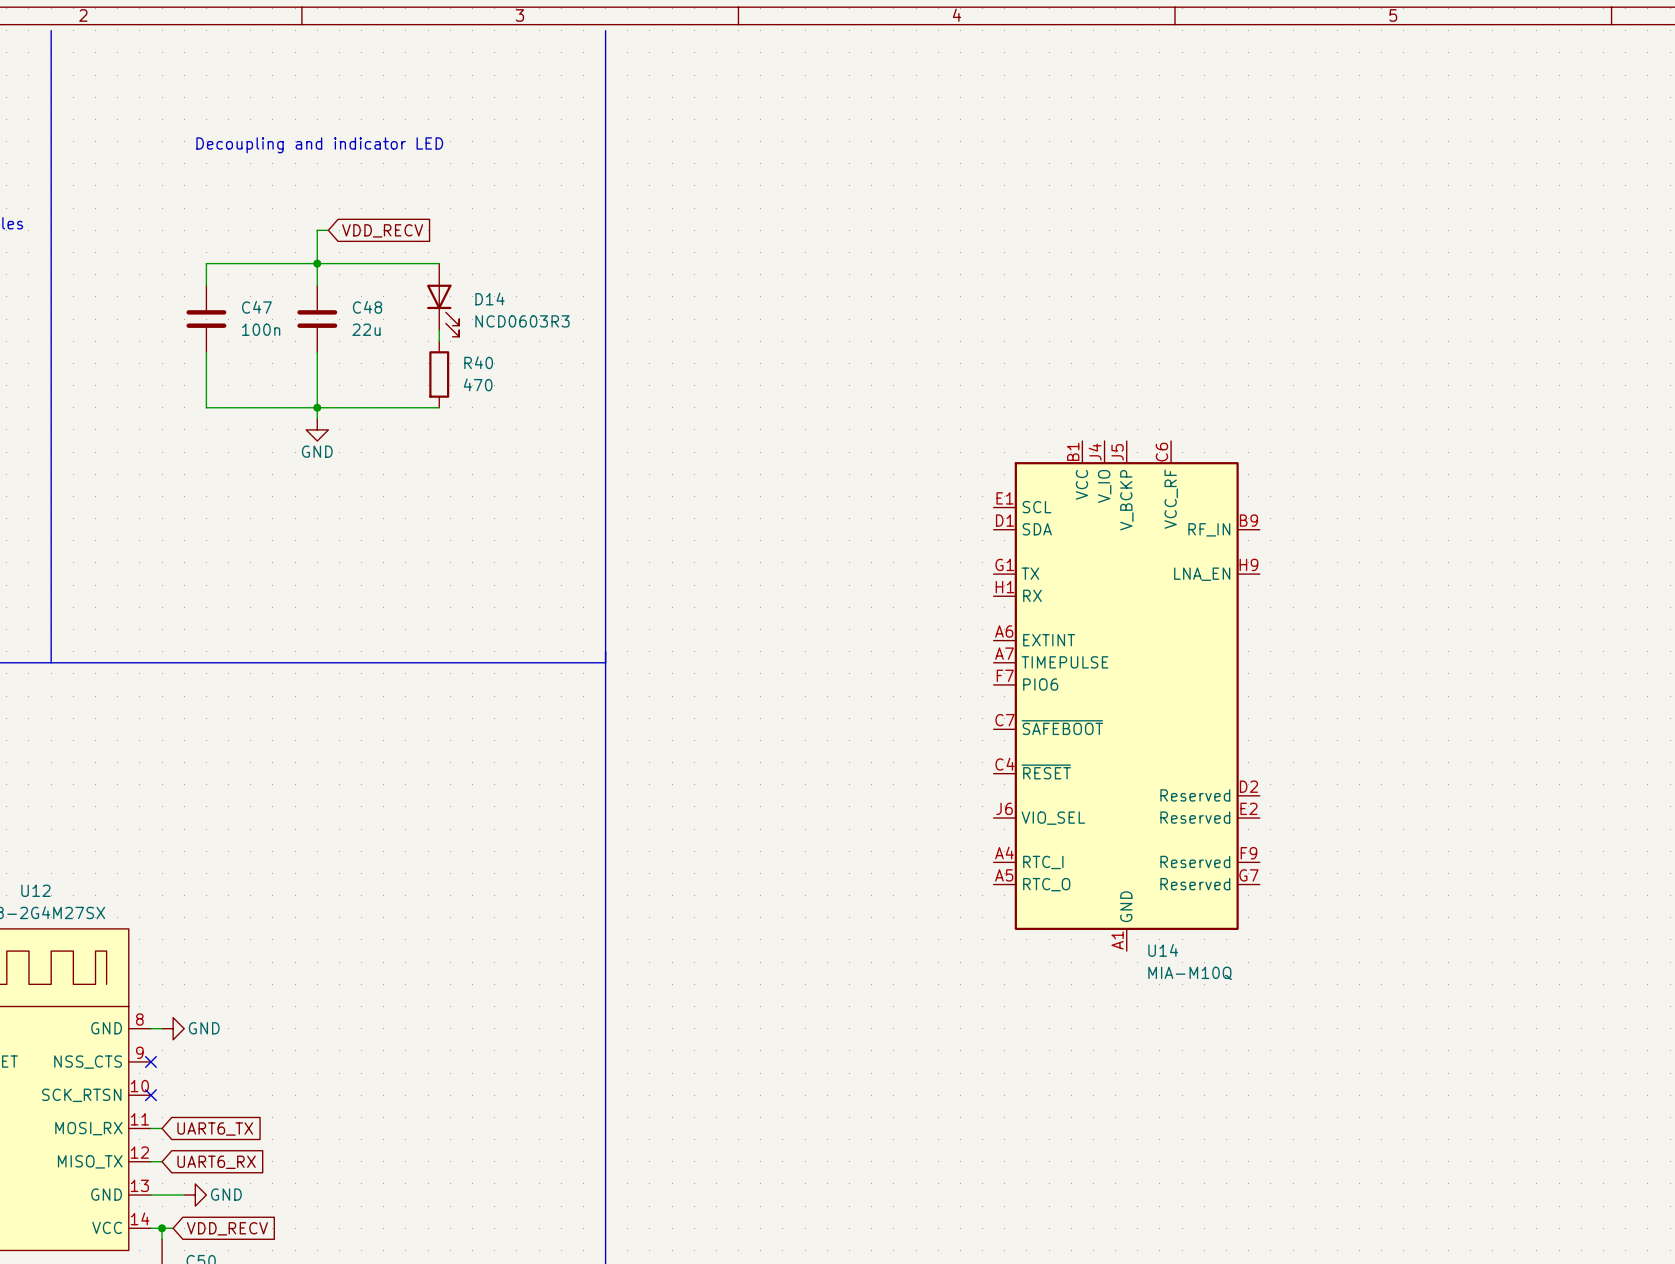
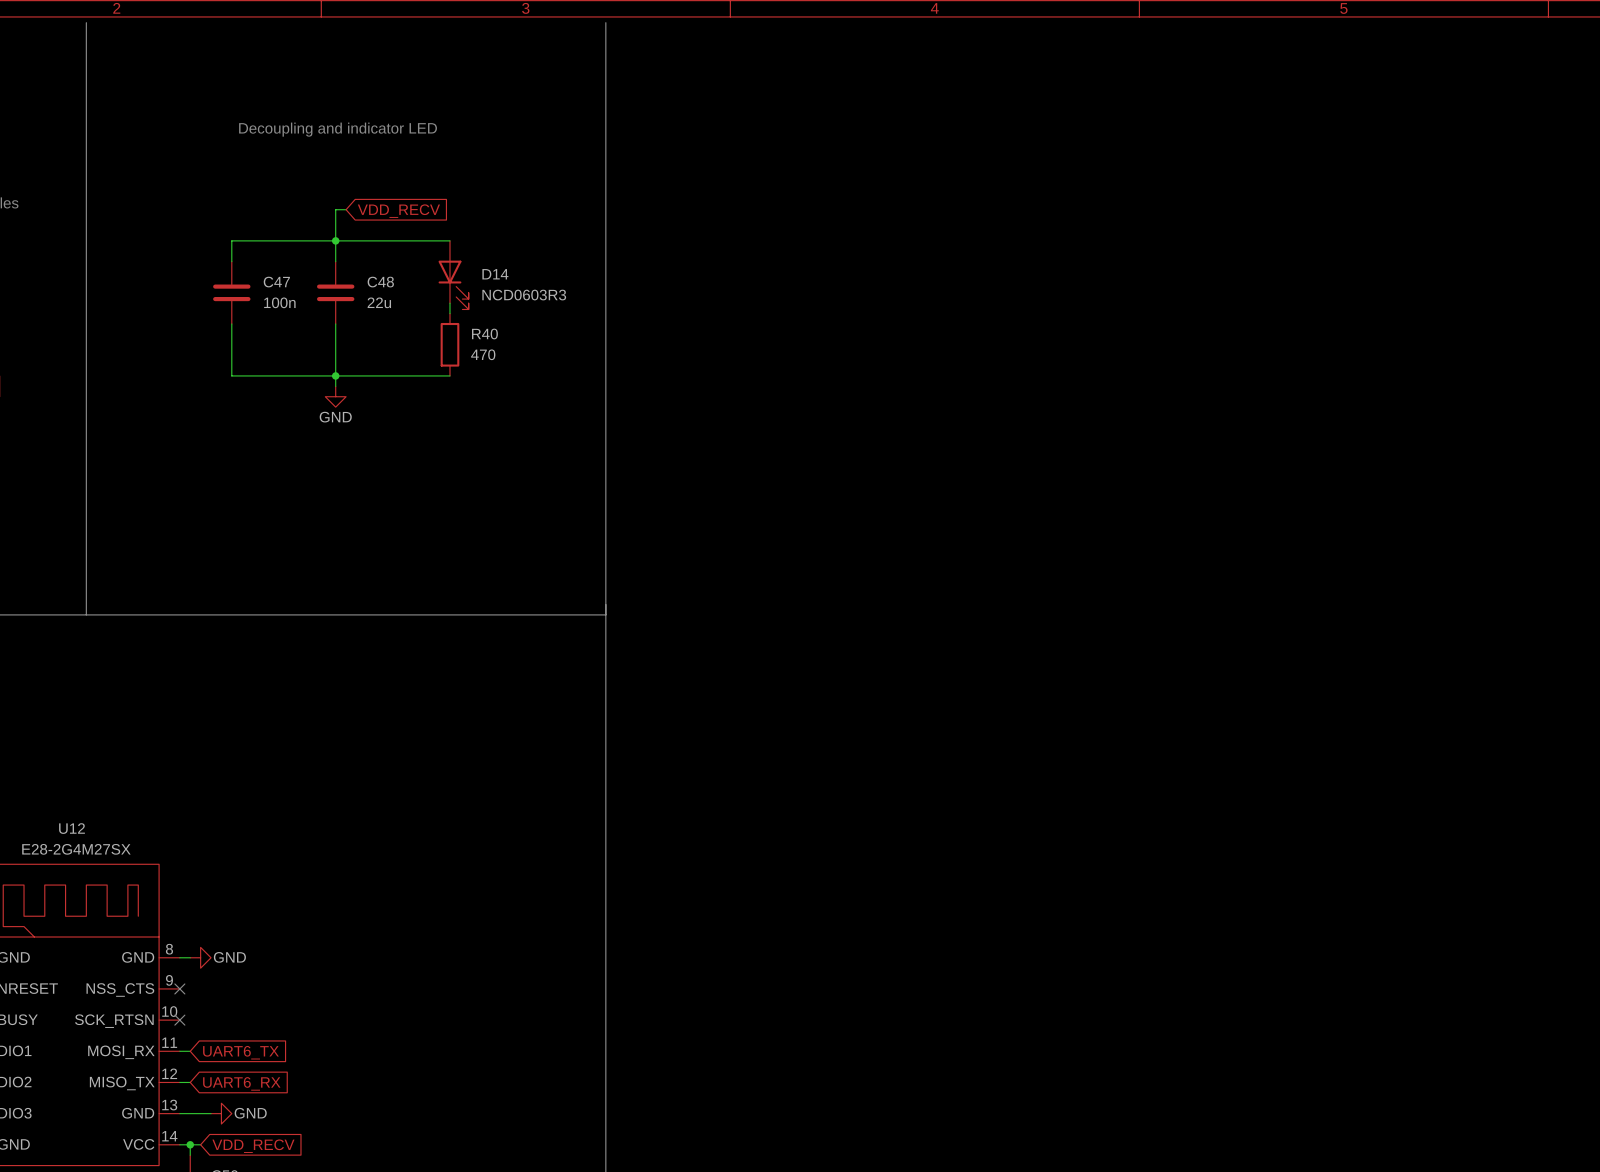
U14: MIA-M10Q (1126, 696) -> none

